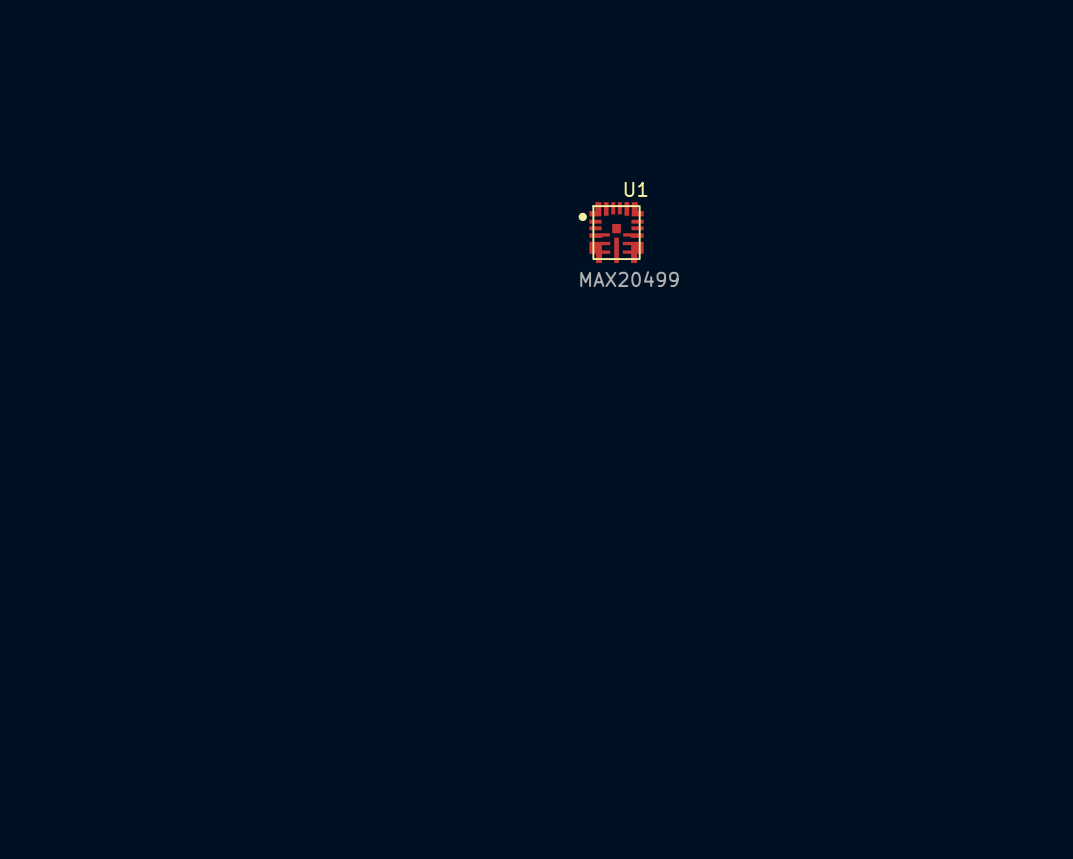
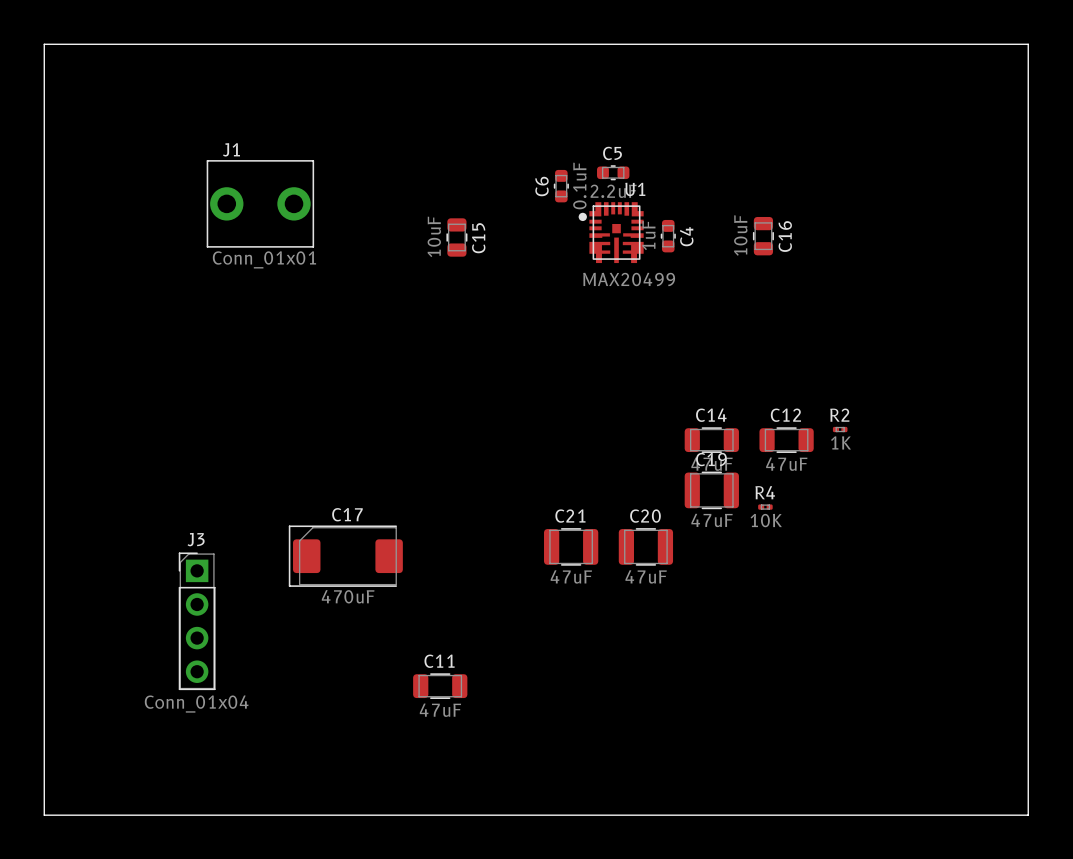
board edge: none -> (44, 44) (1028, 44) (1028, 815) (44, 815) (44, 44)
C5: none -> 2.2uF (613, 172)
C6: none -> 0.1uF (561, 186)
J1: none -> Conn_01x01 (260, 203)
C4: none -> 1uF (668, 236)
C16: none -> 10uF (763, 236)
C15: none -> 10uF (456, 237)
R2: none -> 1K (840, 429)
C14: none -> 47uF (711, 440)
C12: none -> 47uF (786, 440)
C19: none -> 47uF (711, 490)
R4: none -> 10K (765, 507)
C21: none -> 47uF (571, 546)
C20: none -> 47uF (645, 546)
C17: none -> 470uF (345, 556)
J3: none -> Conn_01x04 (197, 621)
C11: none -> 47uF (440, 686)

